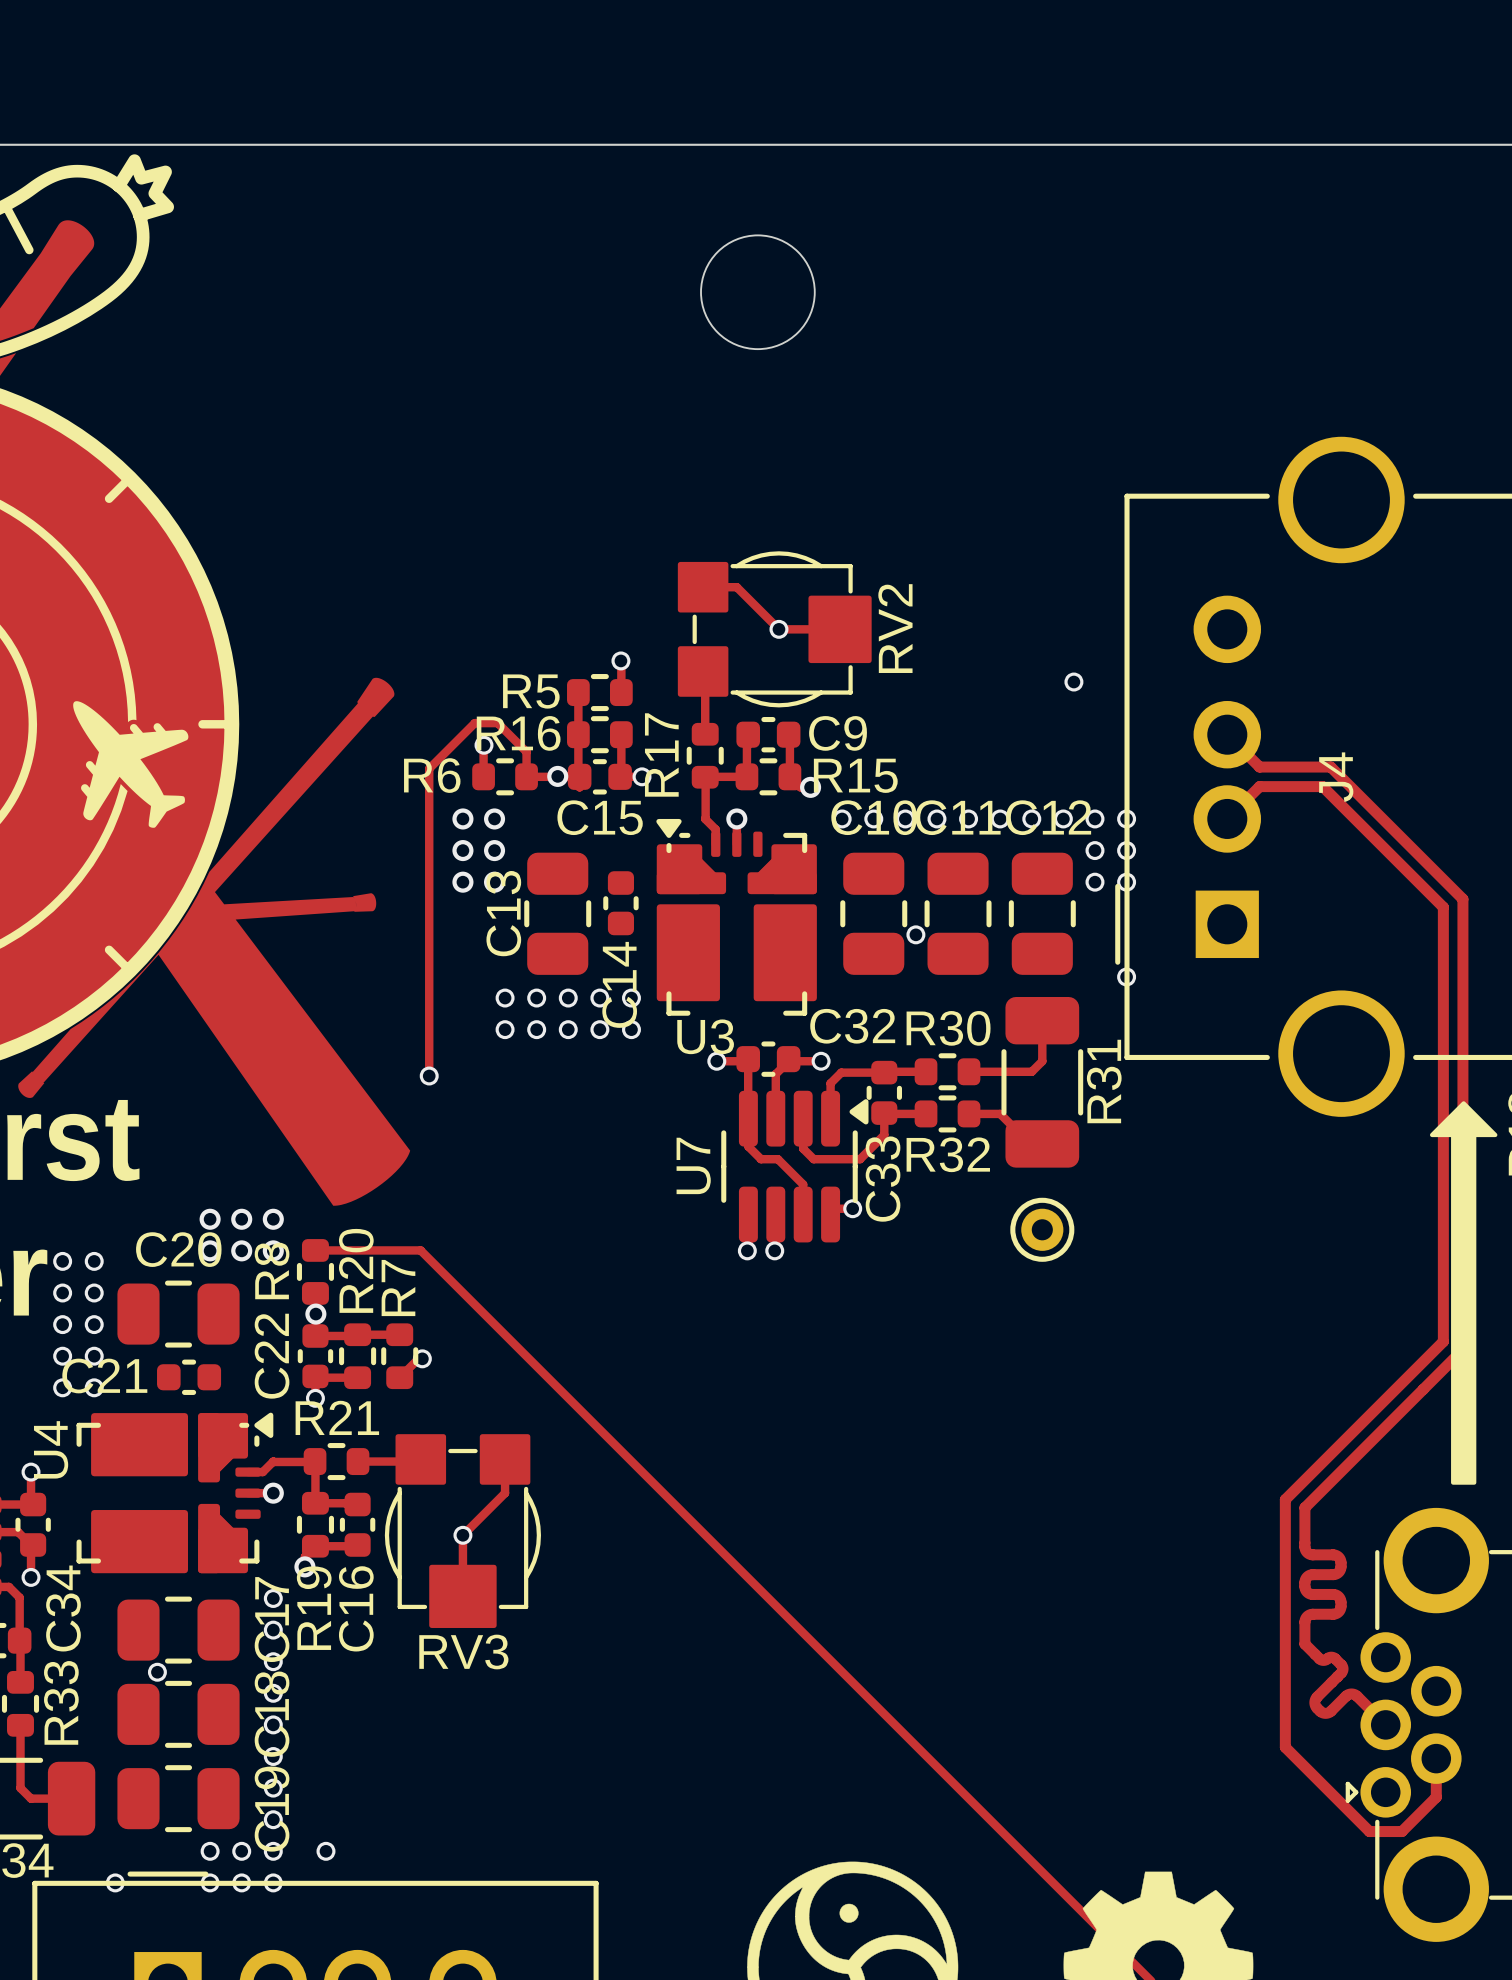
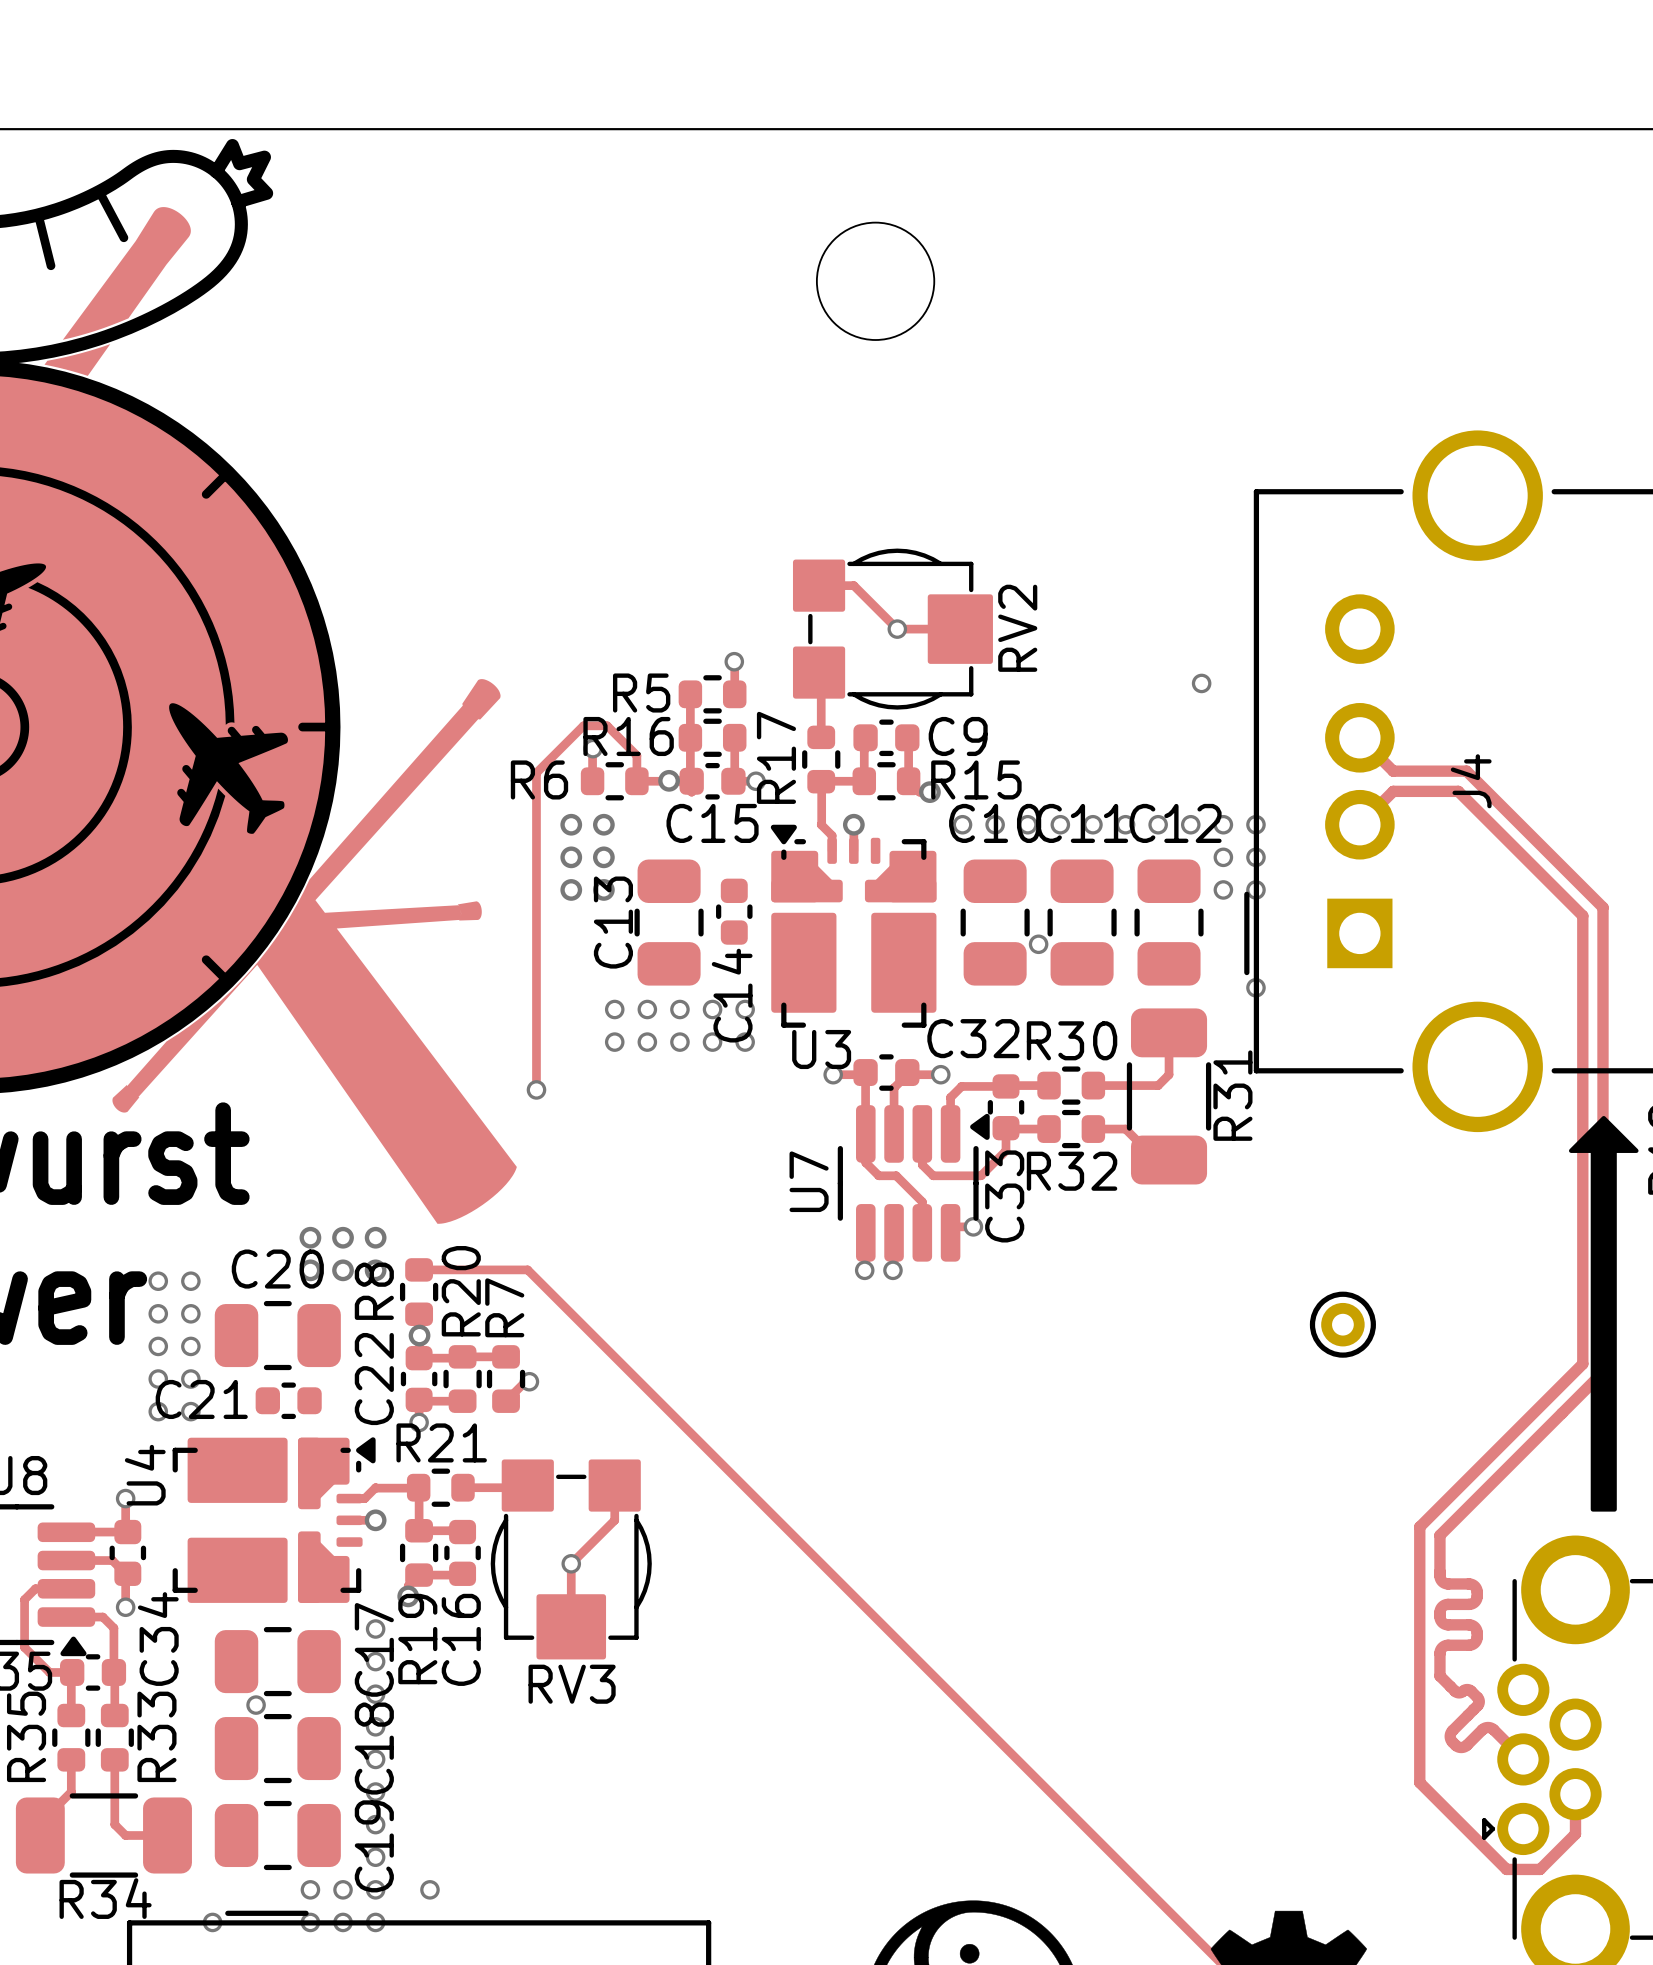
part position: (1042, 1229) -> (1342, 1324)

